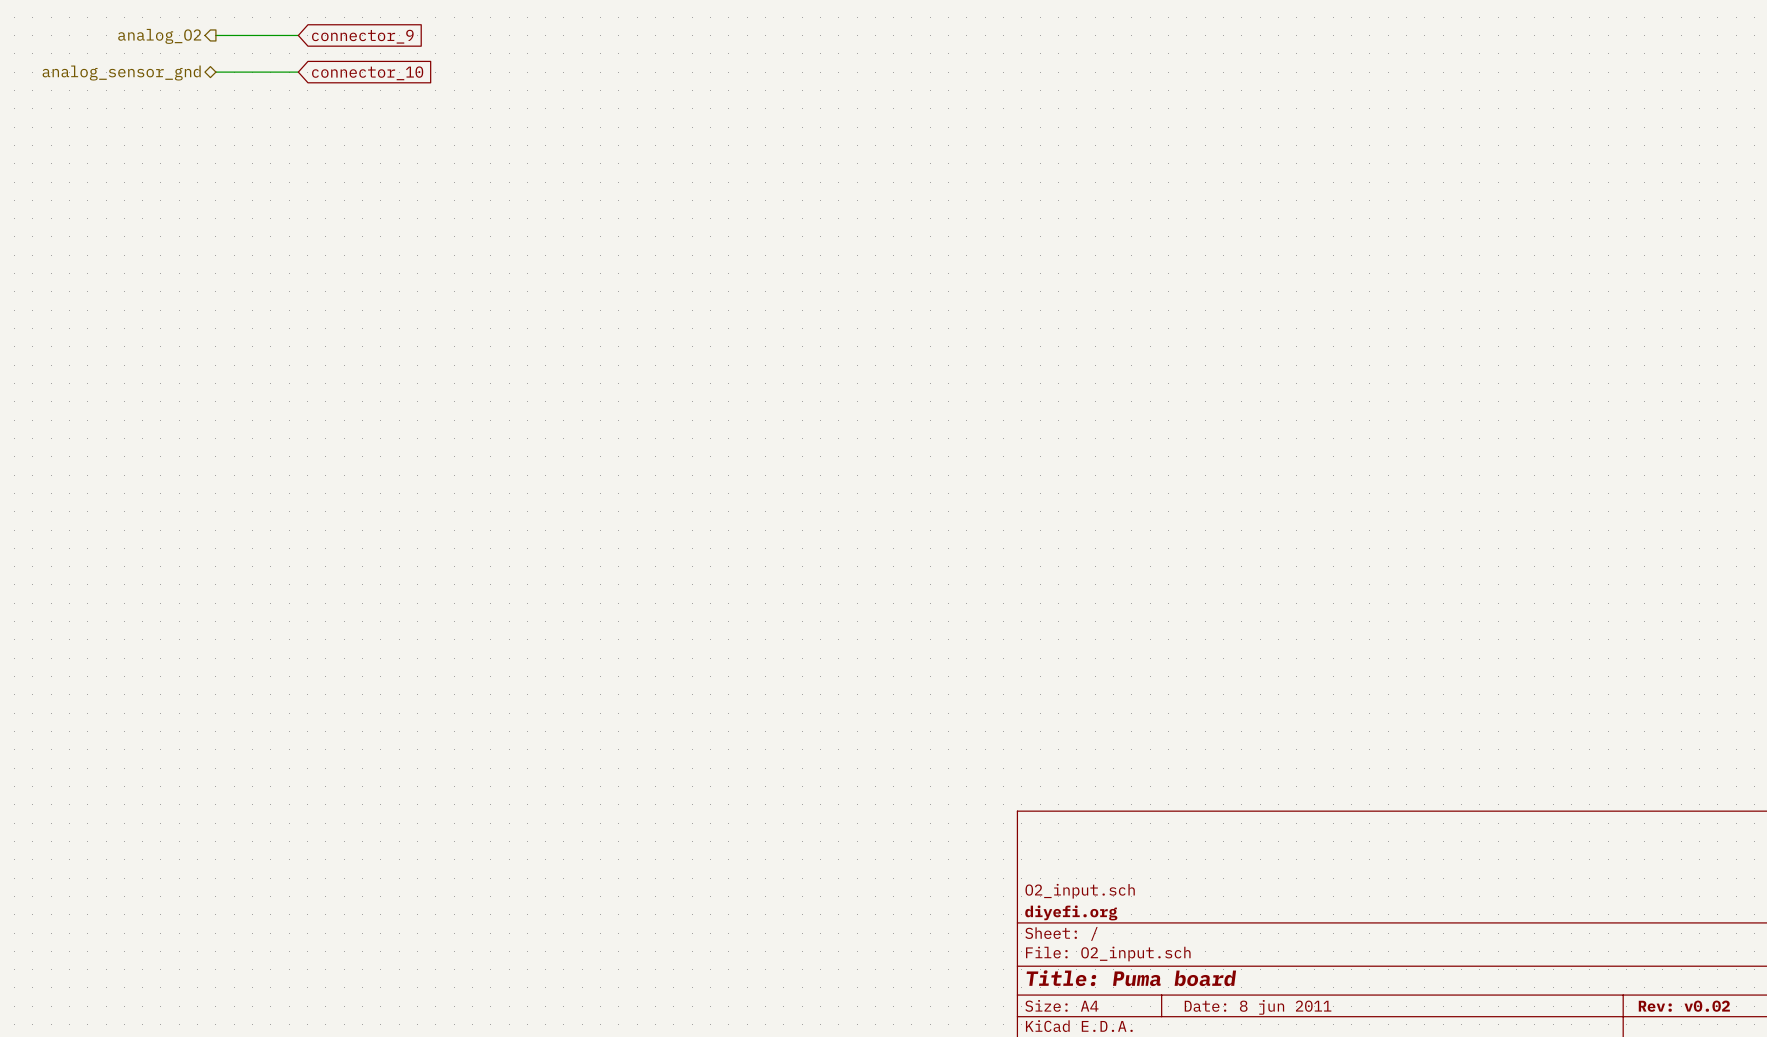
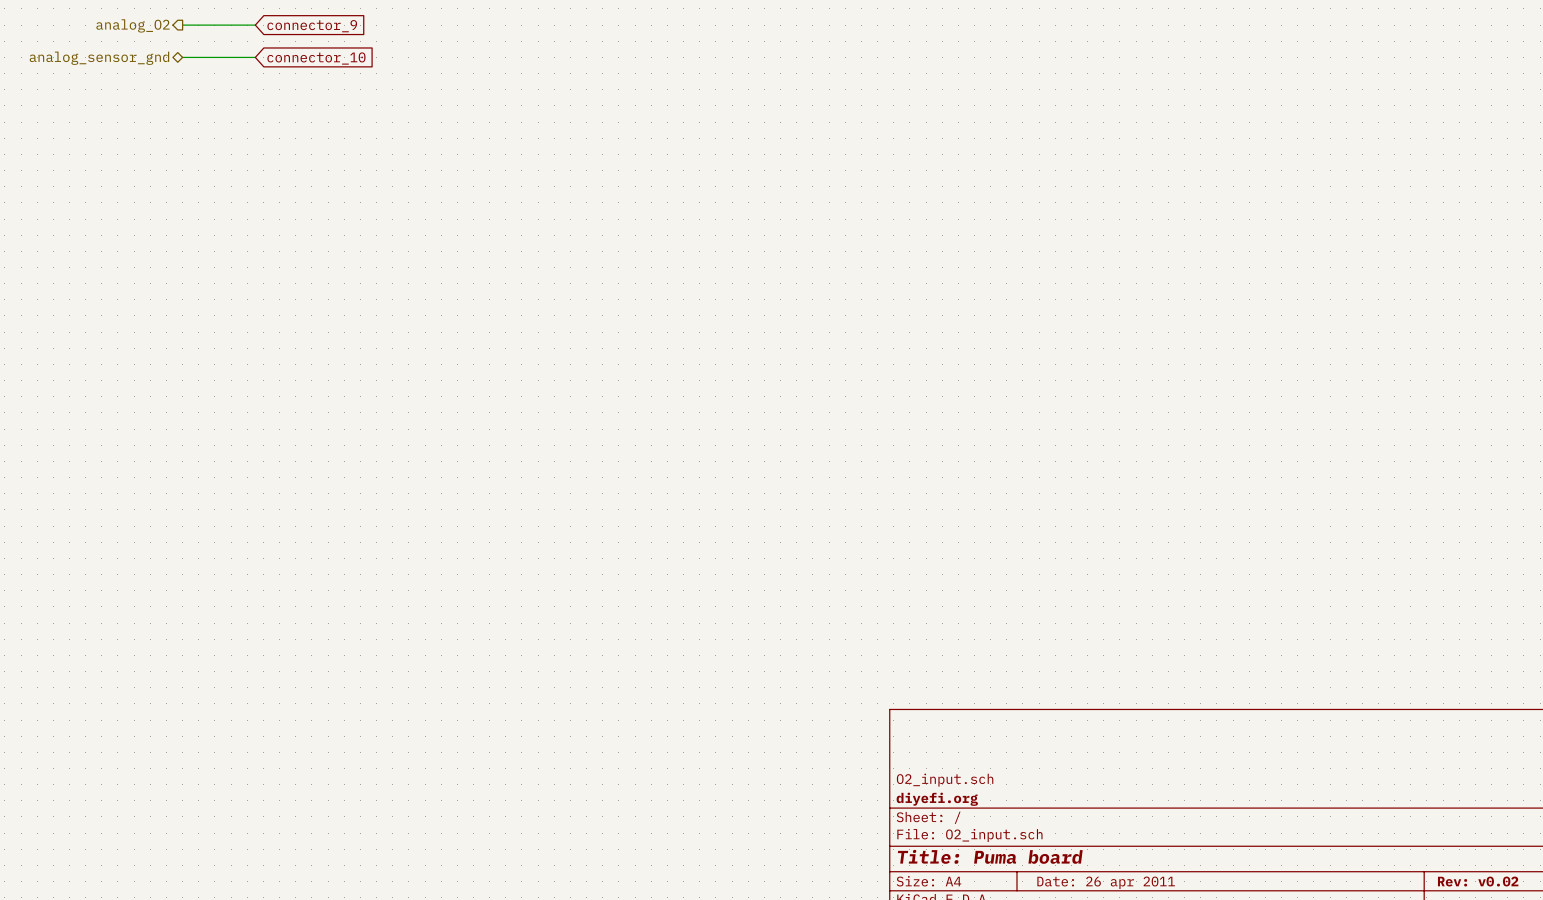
title block: Date: 8 jun 2011 (1258, 1007) -> Date: 26 apr 2011 (1106, 882)

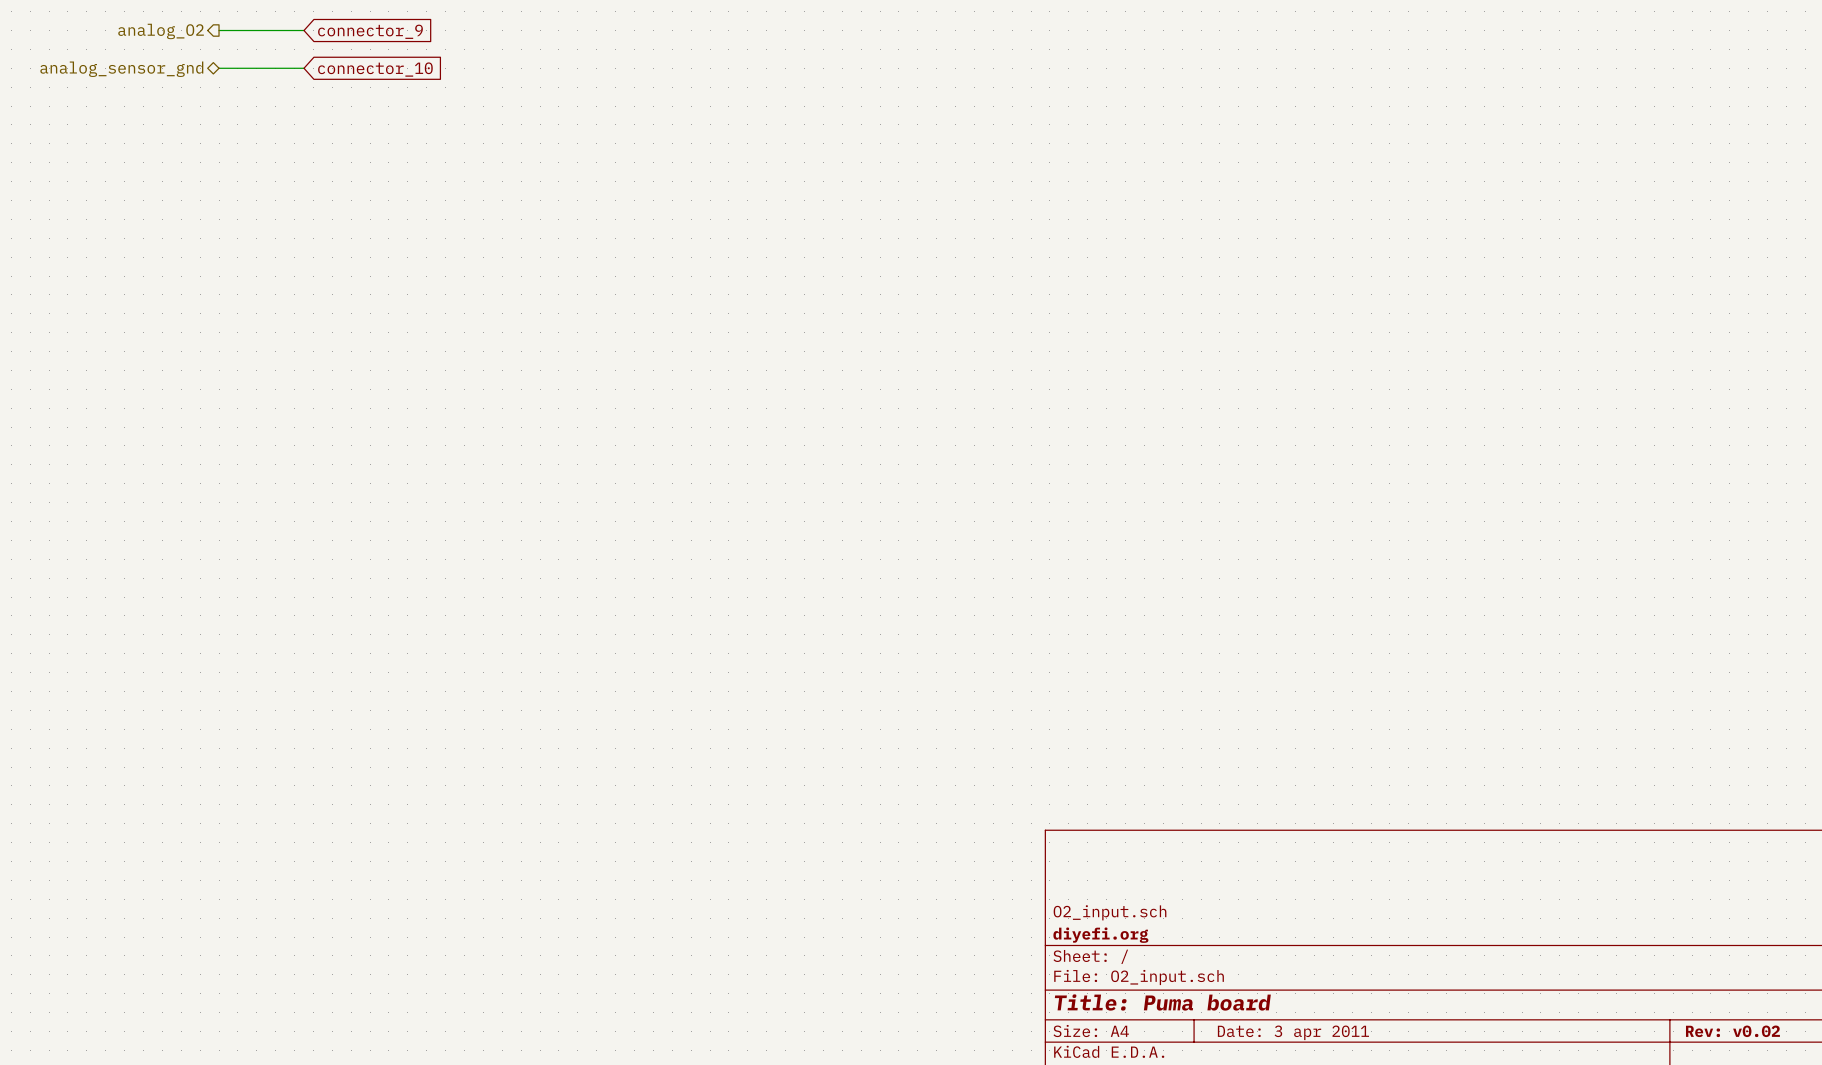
title block: Date: 26 apr 2011 (1106, 882) -> Date: 3 apr 2011 (1293, 1032)

